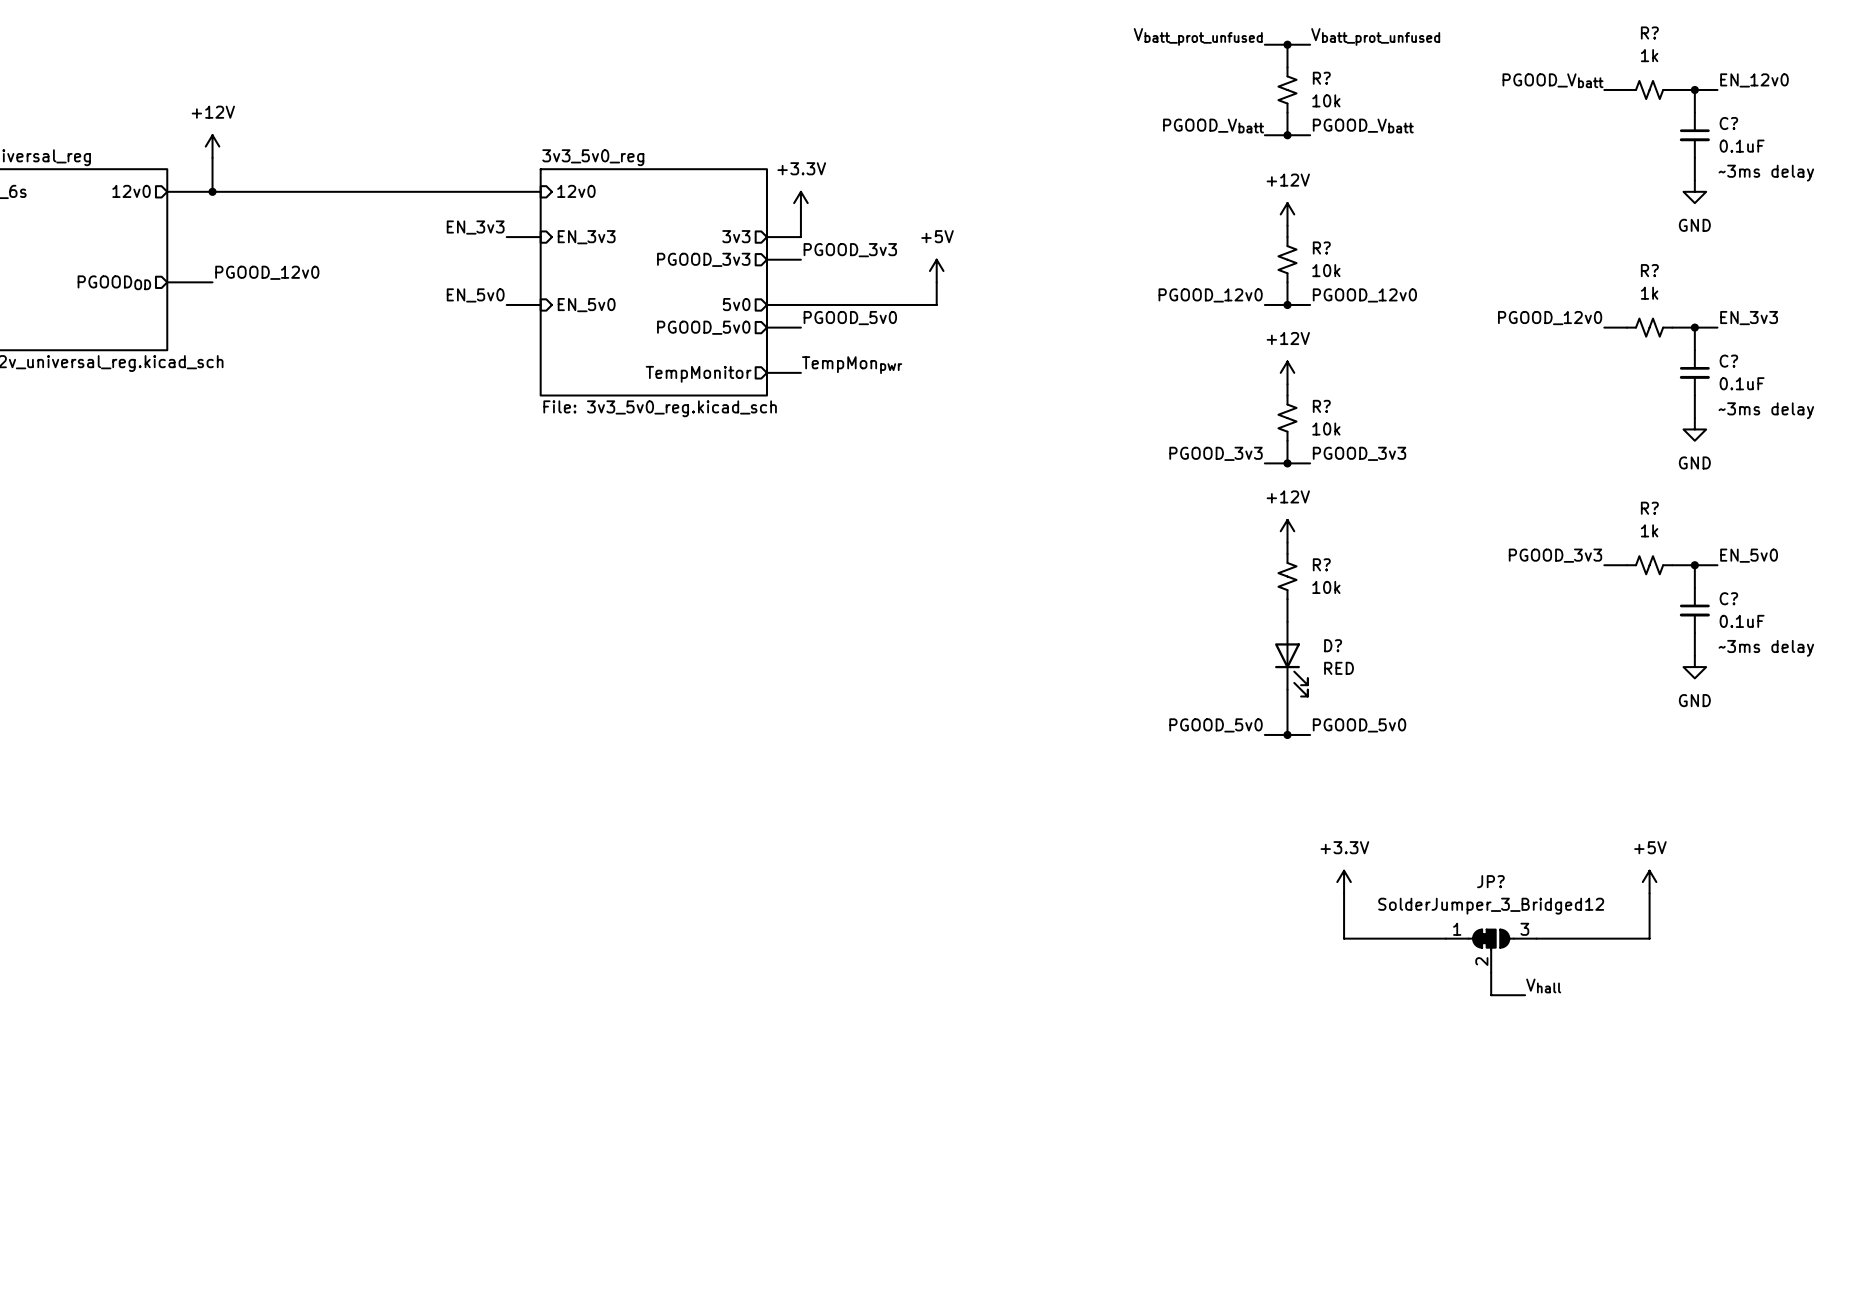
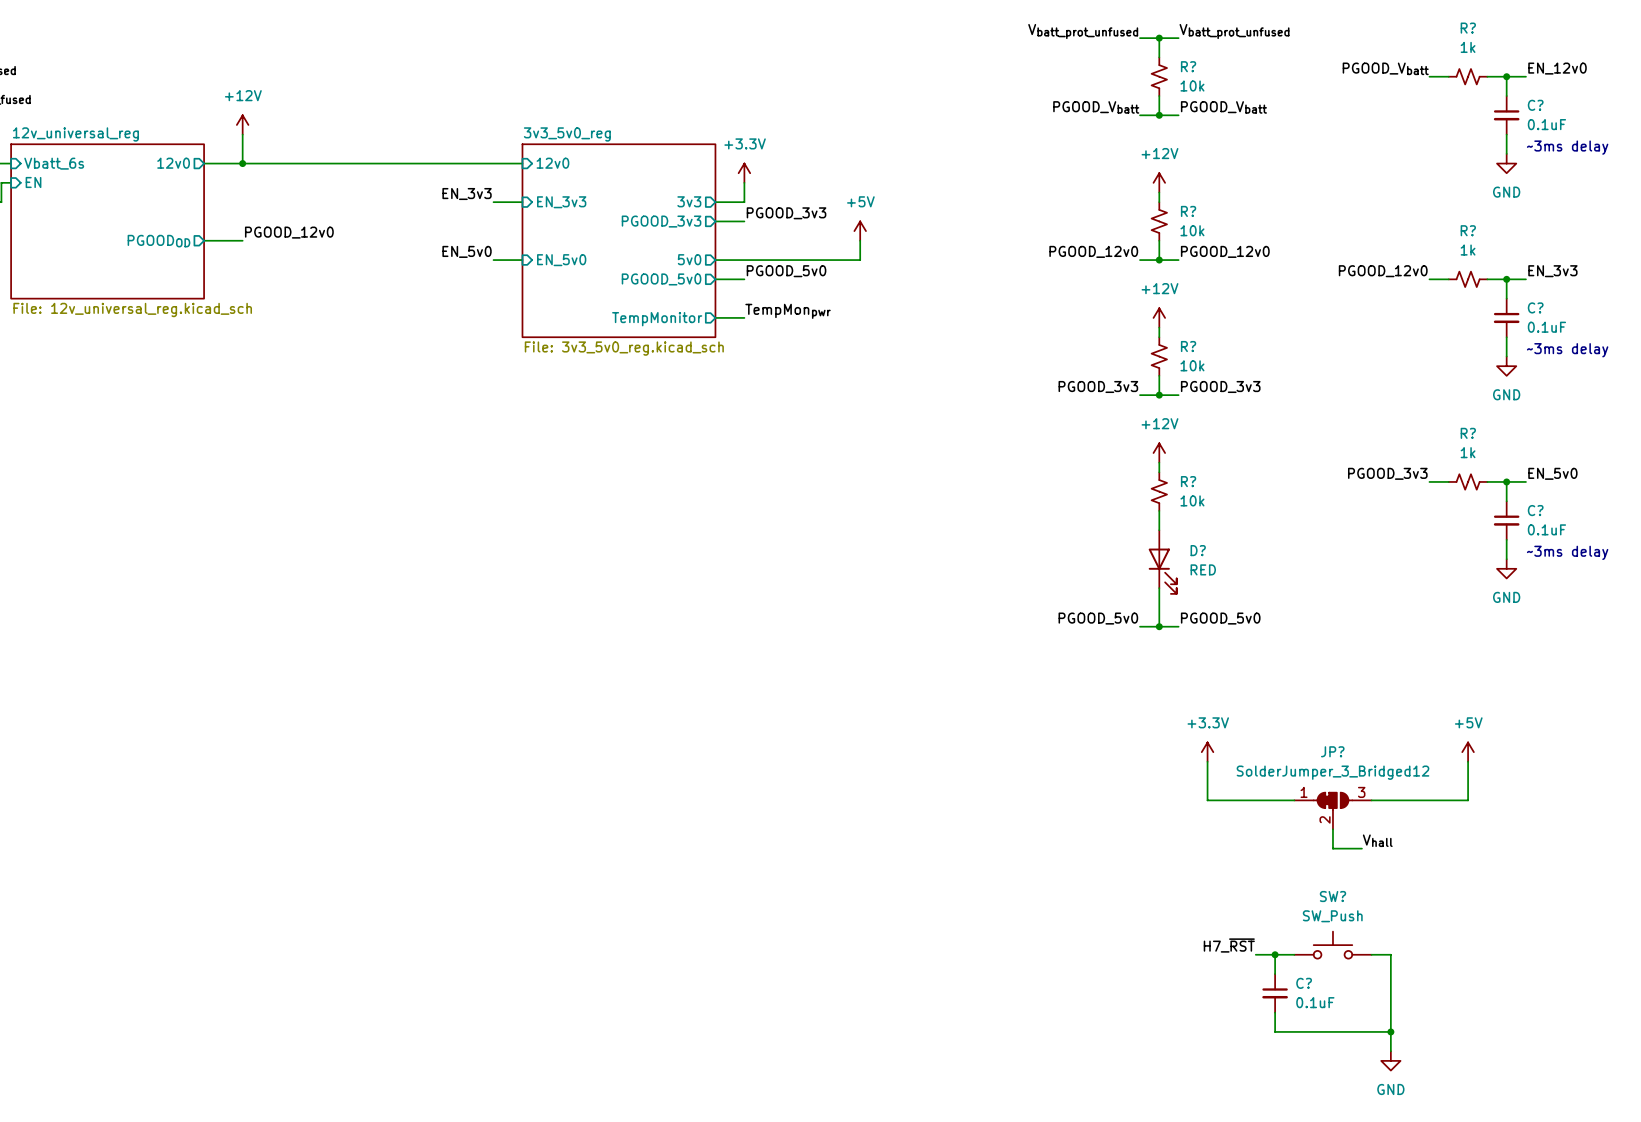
label: none -> H7_~{RST} (1229, 945)
SW?: none -> SW_Push (1332, 945)
wire: none -> (1255, 954) (1294, 954)
wire: none -> (1275, 954) (1275, 974)
junction: none -> (1275, 954)
wire: none -> (1371, 954) (1390, 954) (1390, 1051)
C?: none -> 0.1uF (1275, 993)
wire: none -> (1275, 1012) (1275, 1031) (1390, 1031)
junction: none -> (1390, 1031)
power symbol: none -> GND (1390, 1060)

